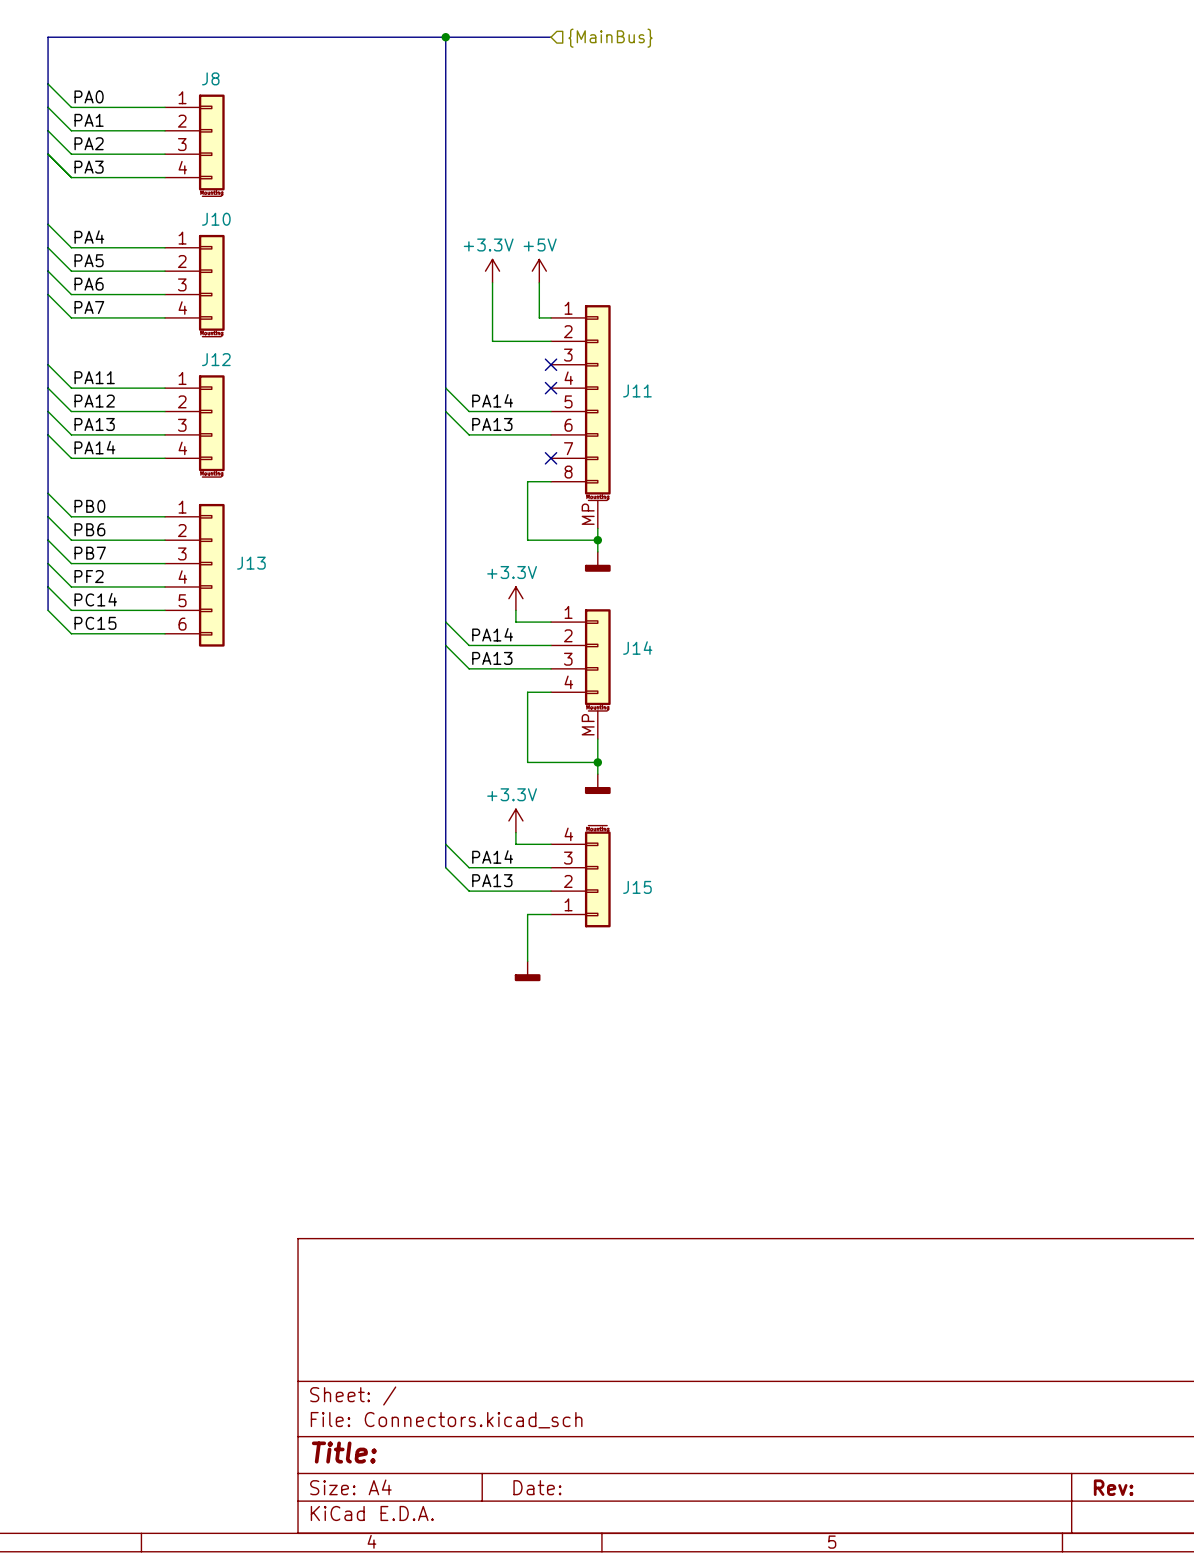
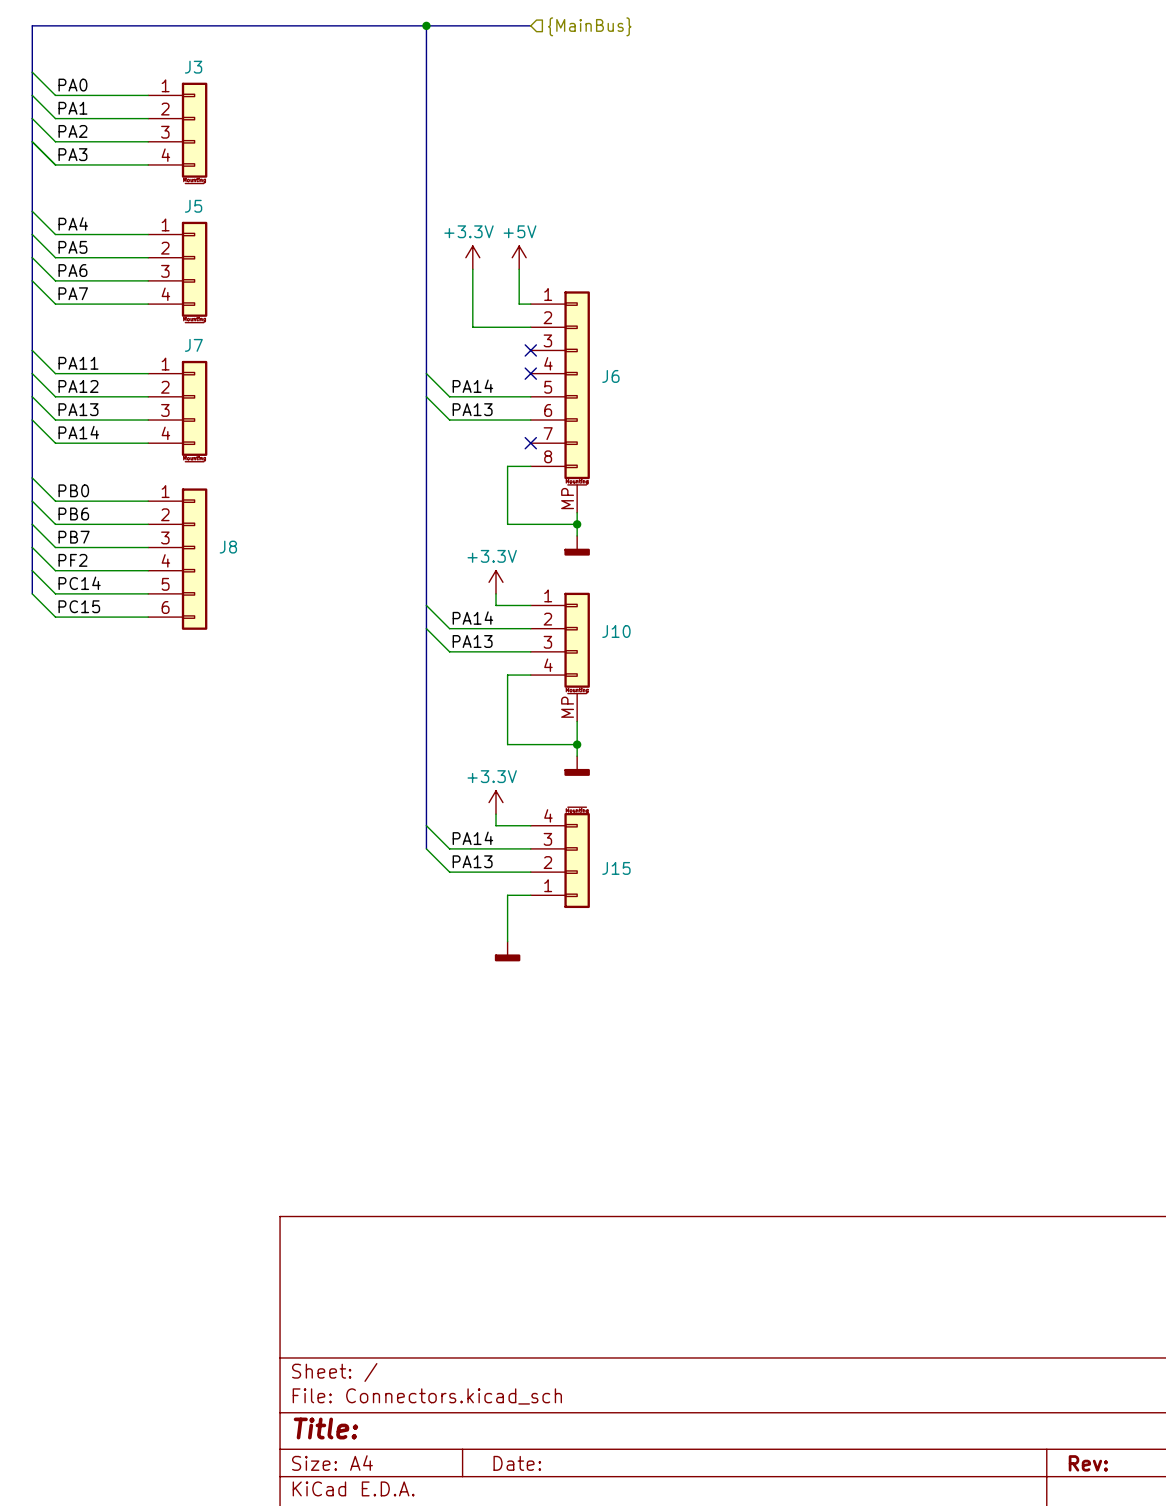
J8 name: J8 (210, 78) -> J3 (193, 67)
J10 name: J10 (216, 219) -> J5 (193, 206)
J12 name: J12 (216, 359) -> J7 (193, 345)
J11 name: J11 (637, 390) -> J6 (610, 376)
J13 name: J13 (251, 563) -> J8 (228, 547)
J14 name: J14 (637, 648) -> J10 (616, 631)

